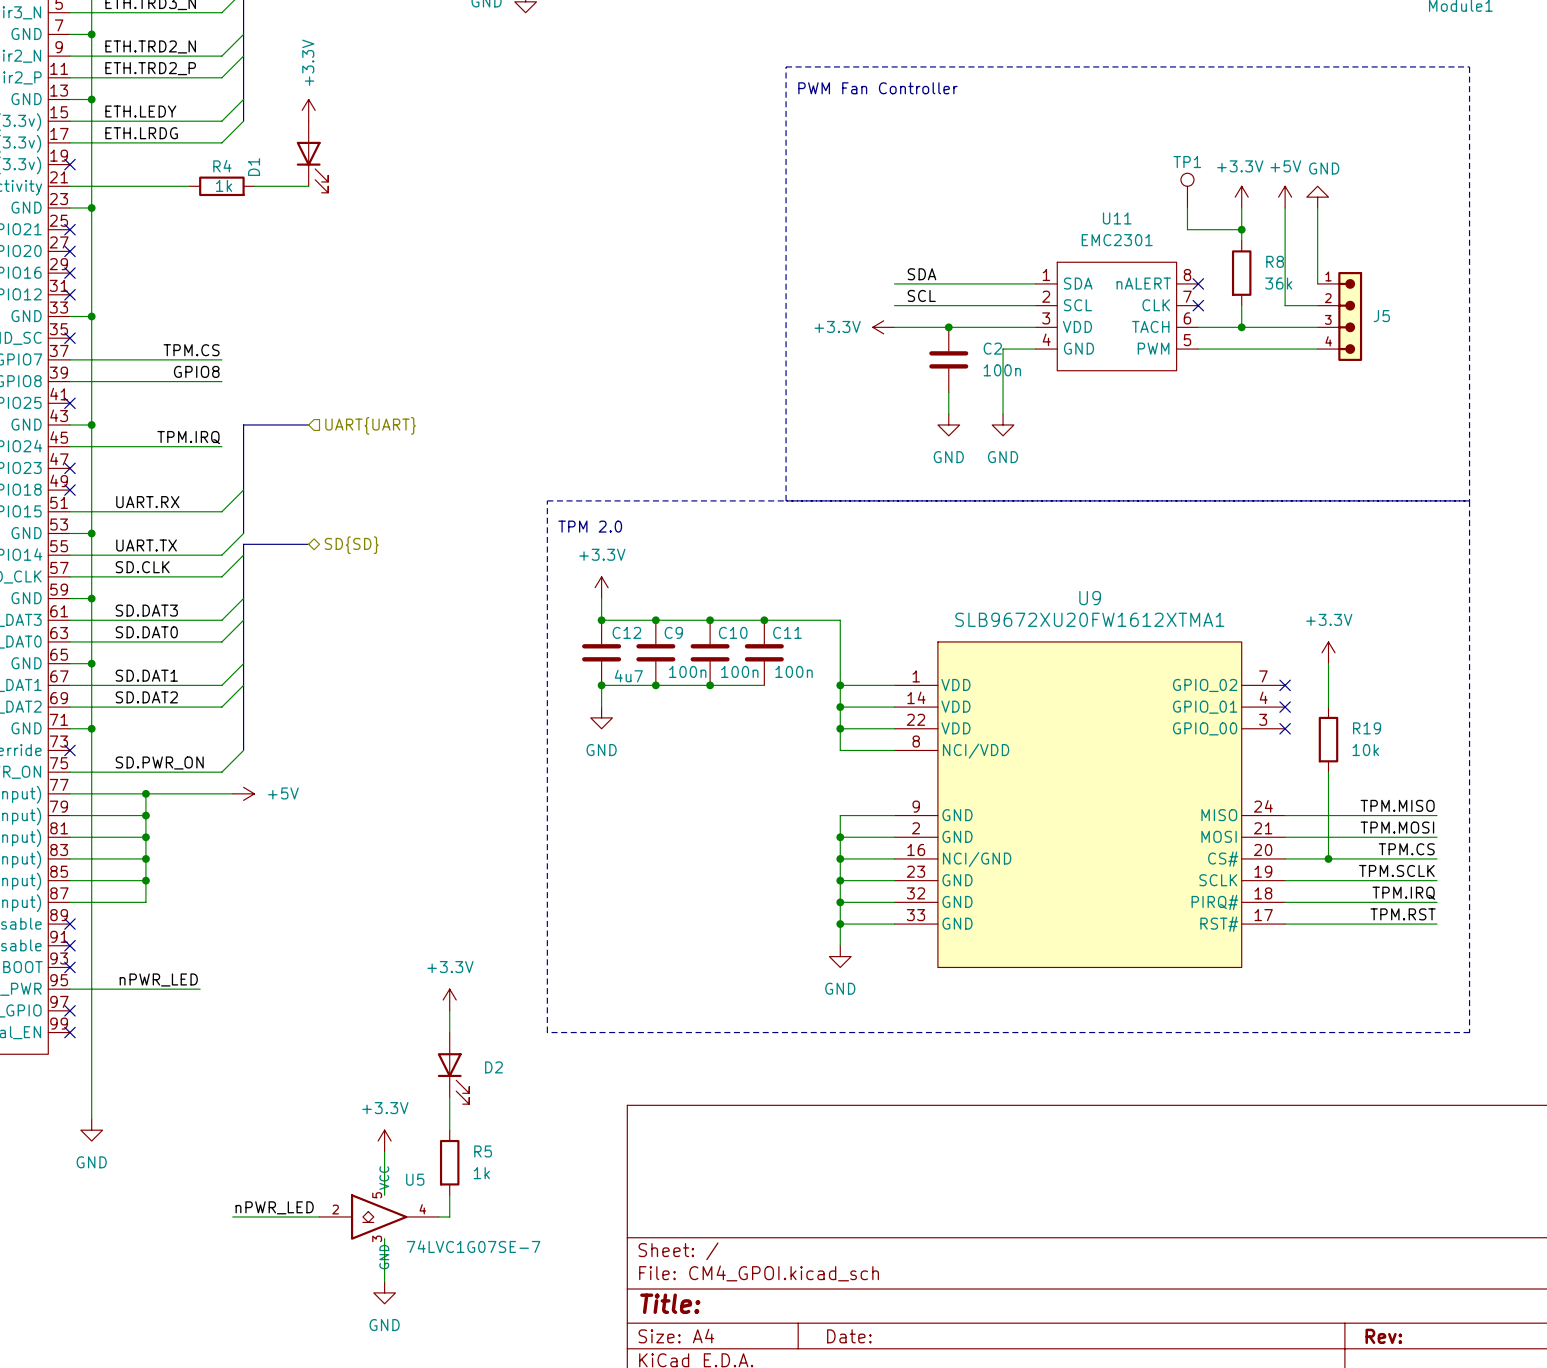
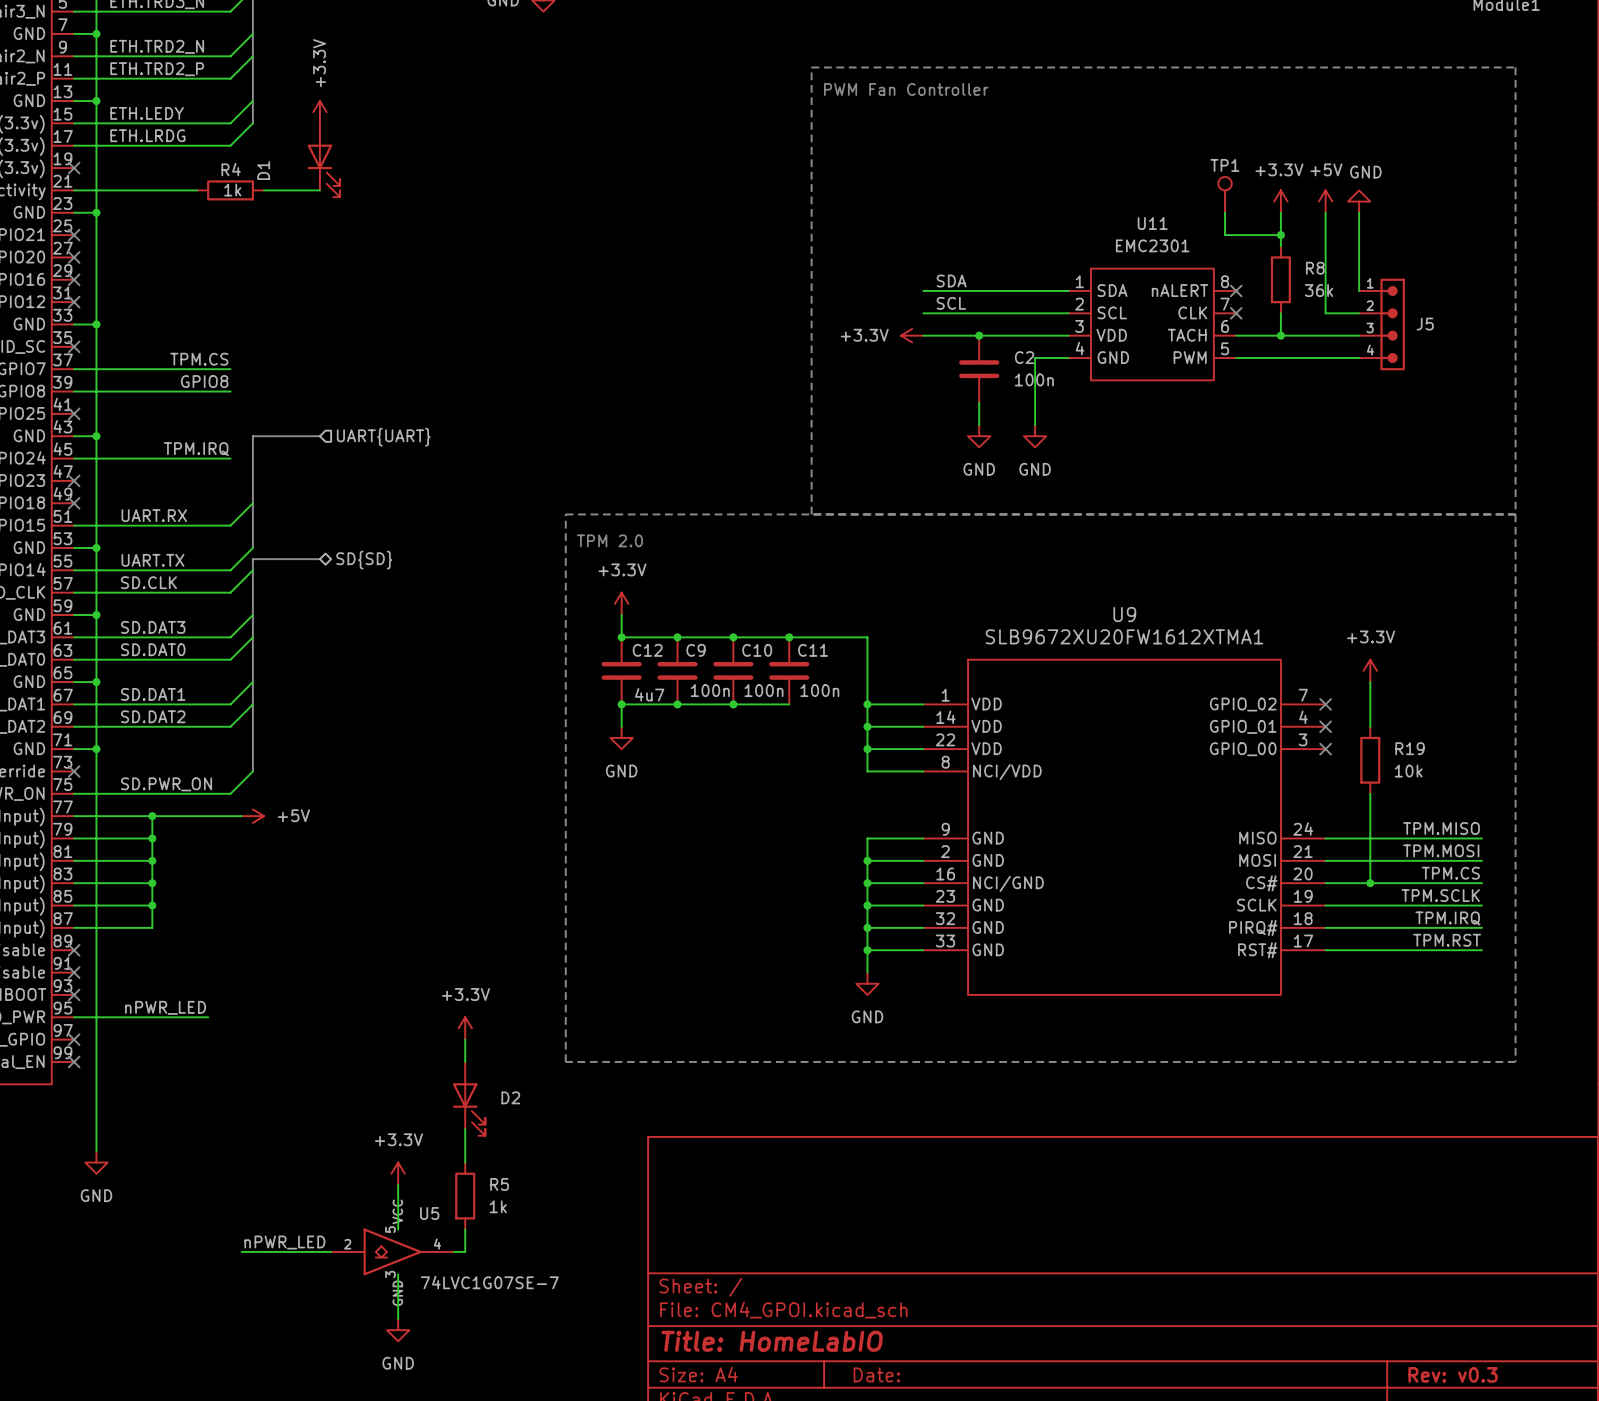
title block: Title: (670, 1303) -> Title: HomeLabIO (772, 1341)
title block: Rev: (1383, 1336) -> Rev: v0.3 (1453, 1374)

